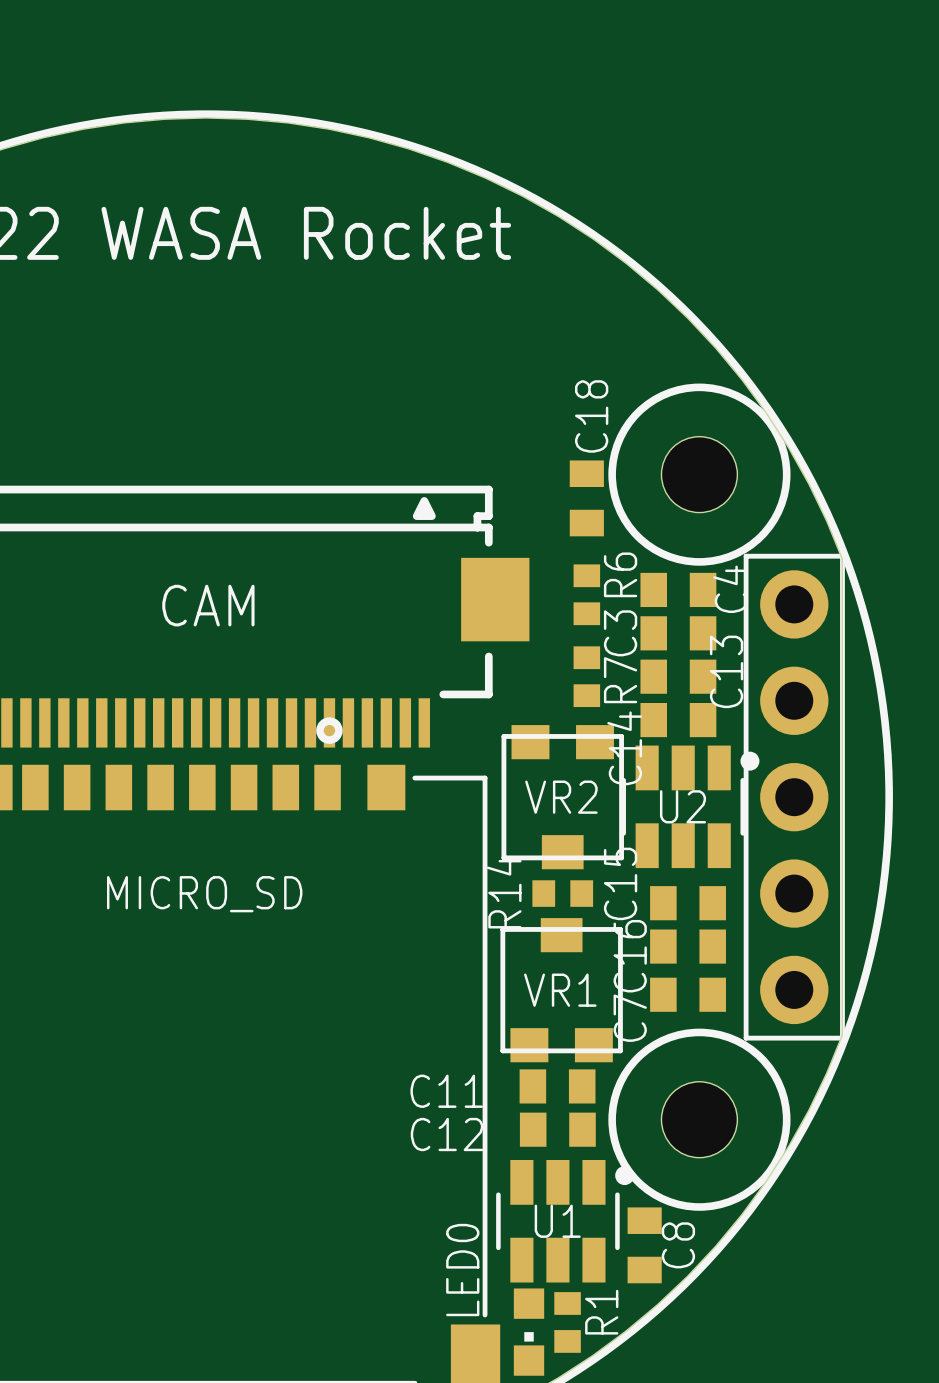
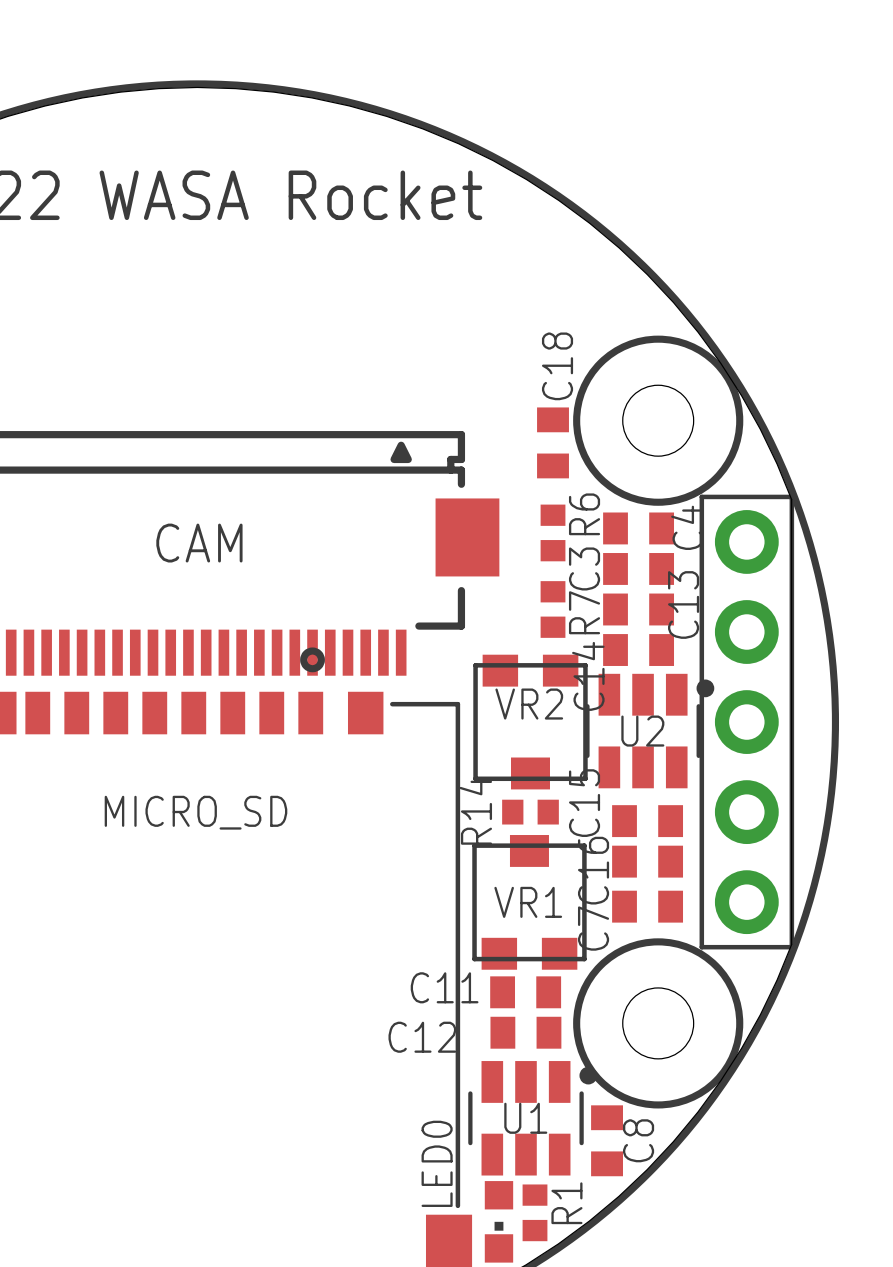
VR2 name position: VR2 (561, 797) -> VR2 (529, 704)
C11 name position: C11 (446, 1091) -> C11 (444, 987)

